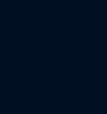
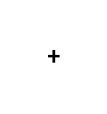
text: none -> + (53, 56)

